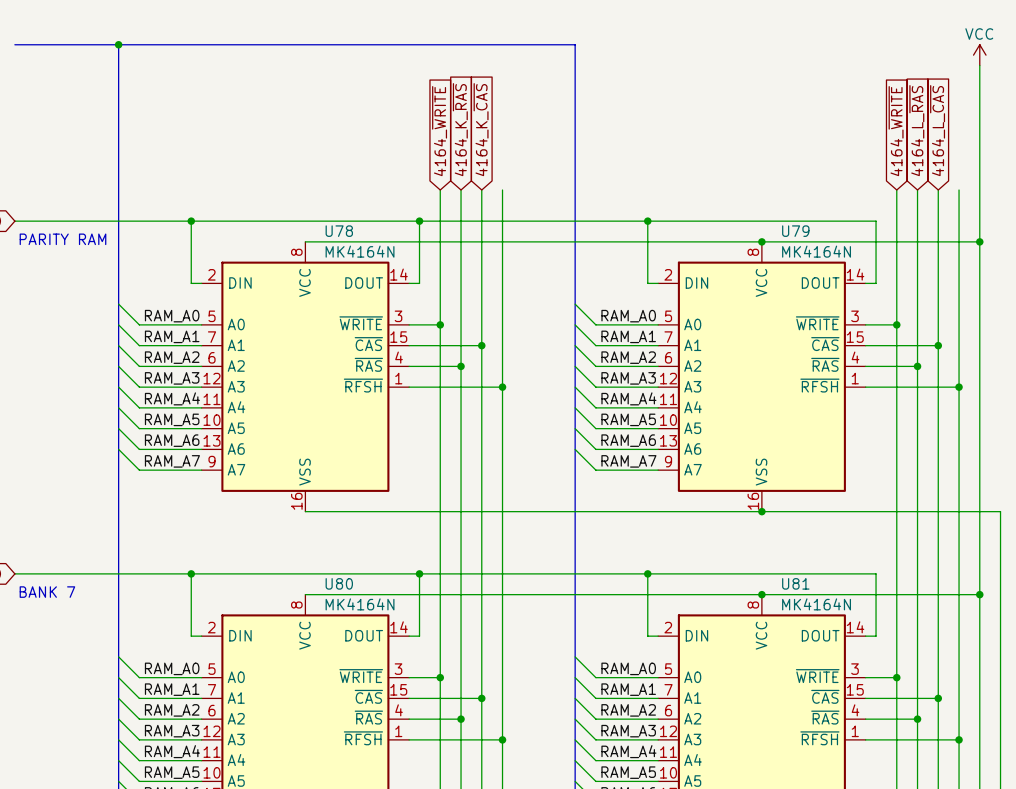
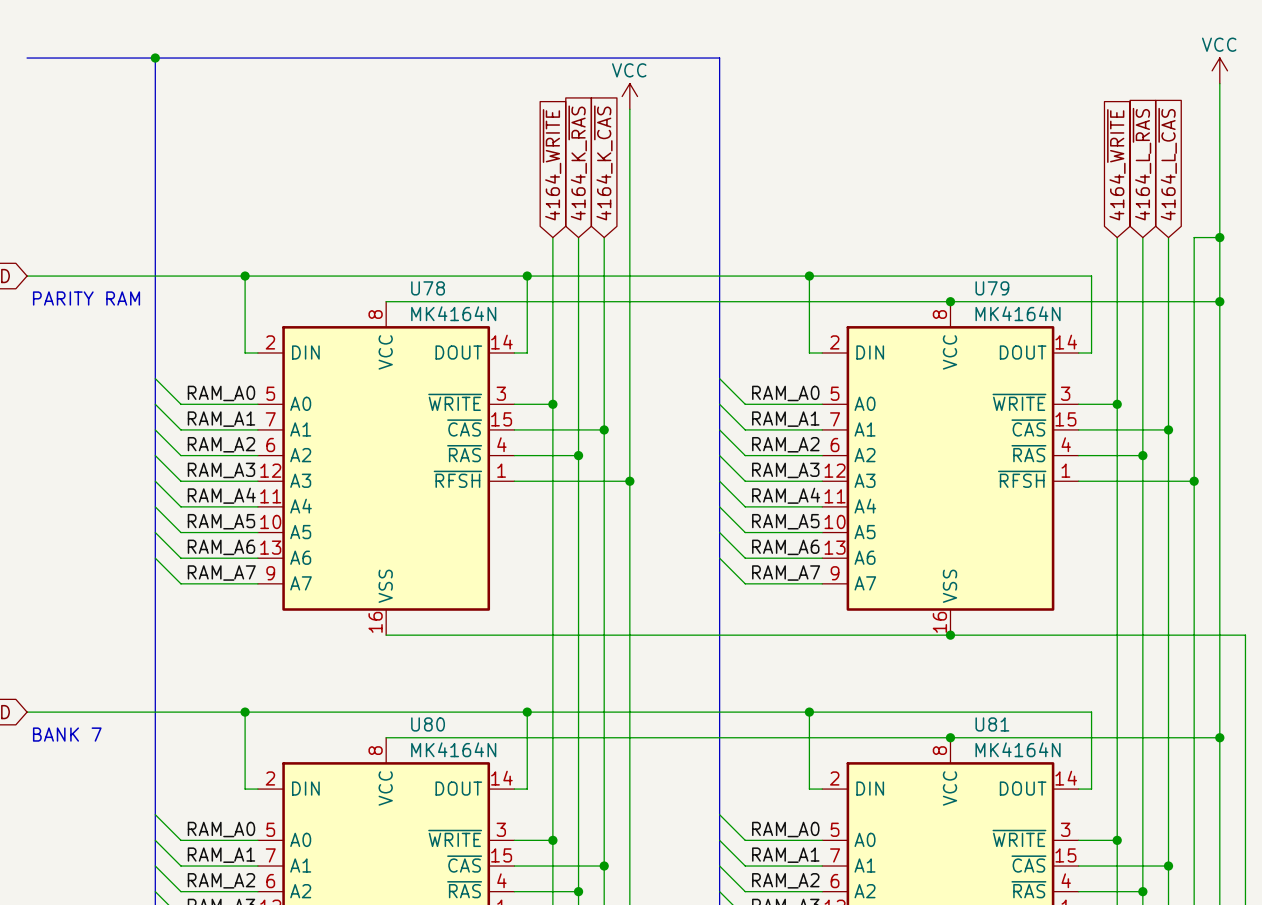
power symbol: none -> VCC (629, 96)
wire: none -> (629, 109) (629, 237)
wire: none -> (1194, 237) (1219, 237)
junction: none -> (1219, 237)

